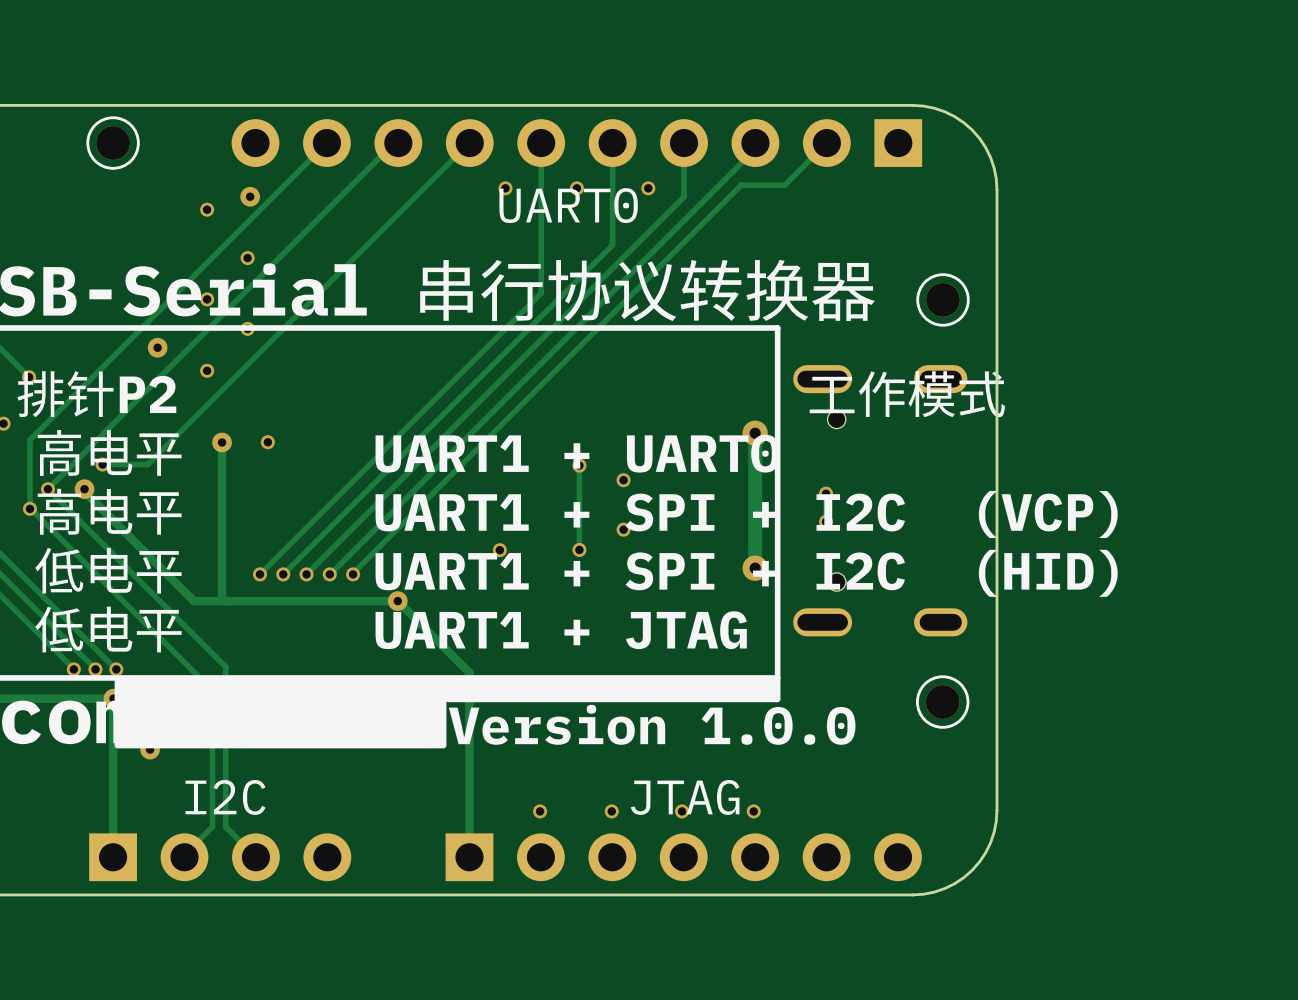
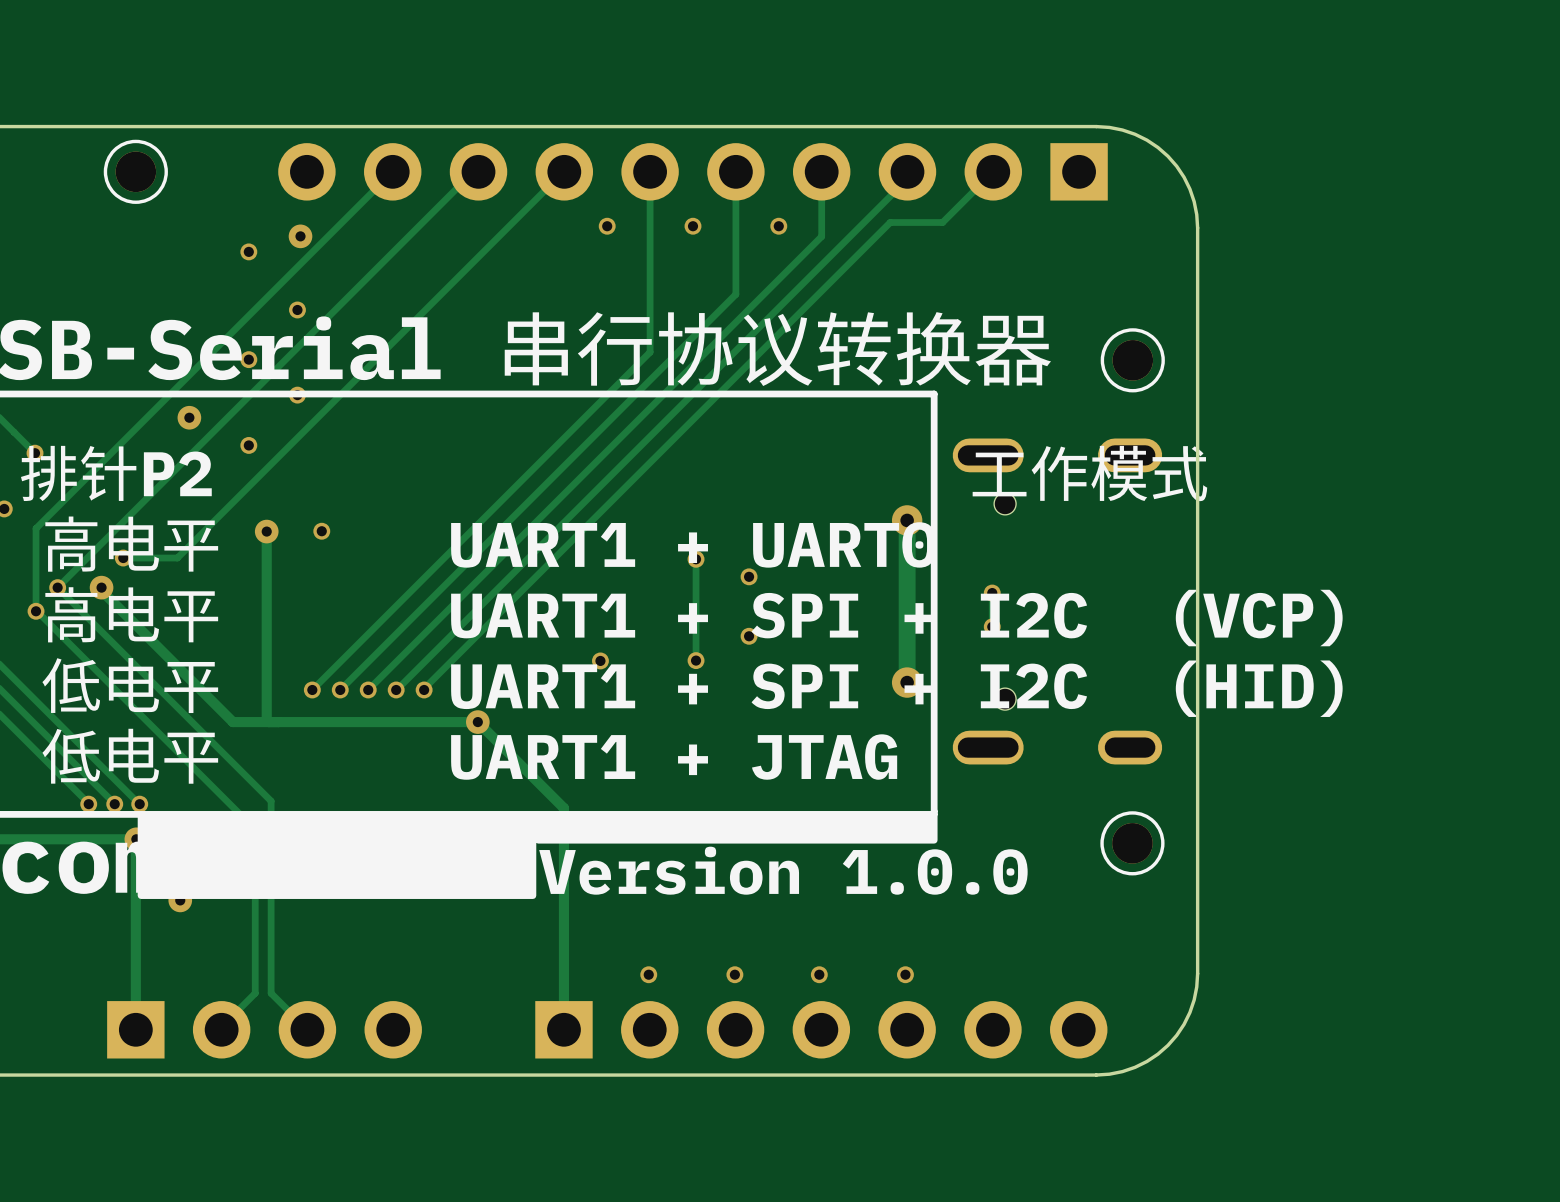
text: UART0 (568, 205) -> none
text: I2C (225, 797) -> none
text: JTAG (685, 797) -> none

